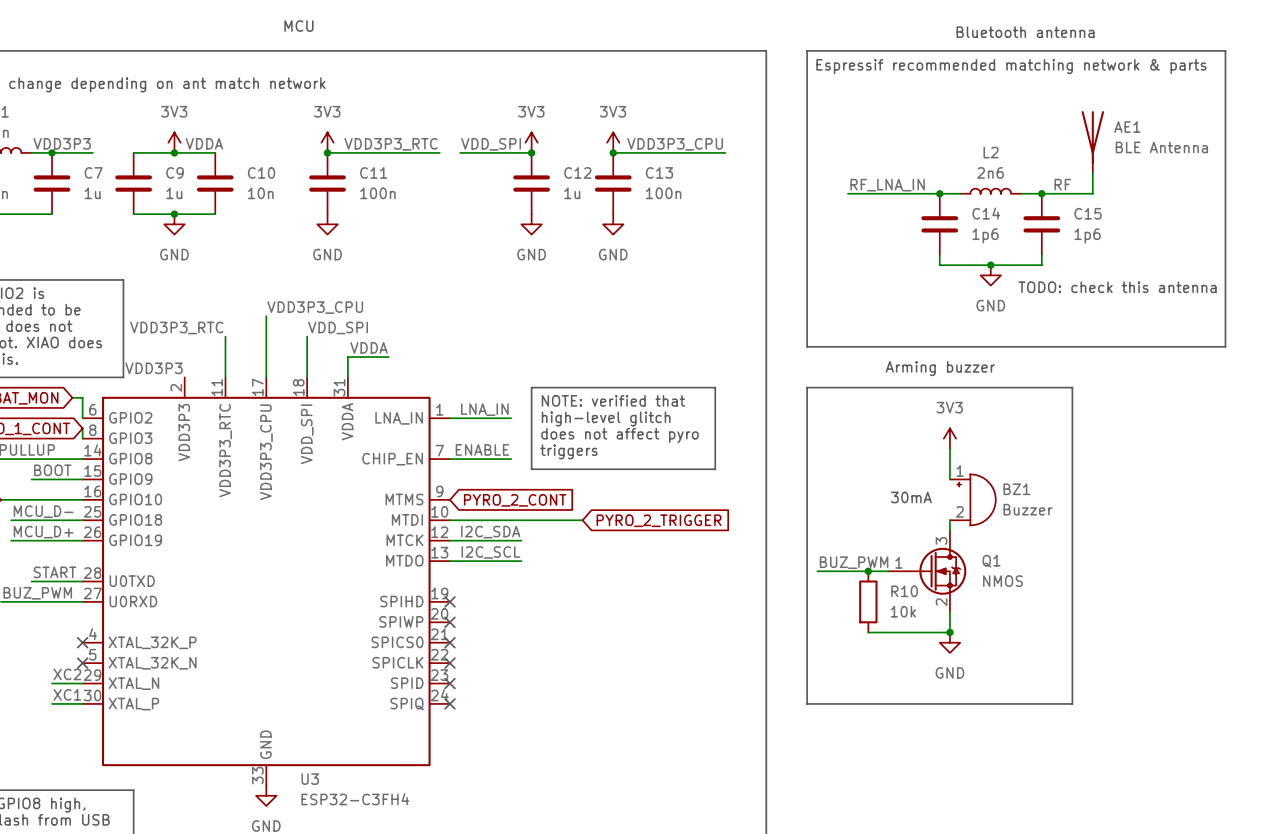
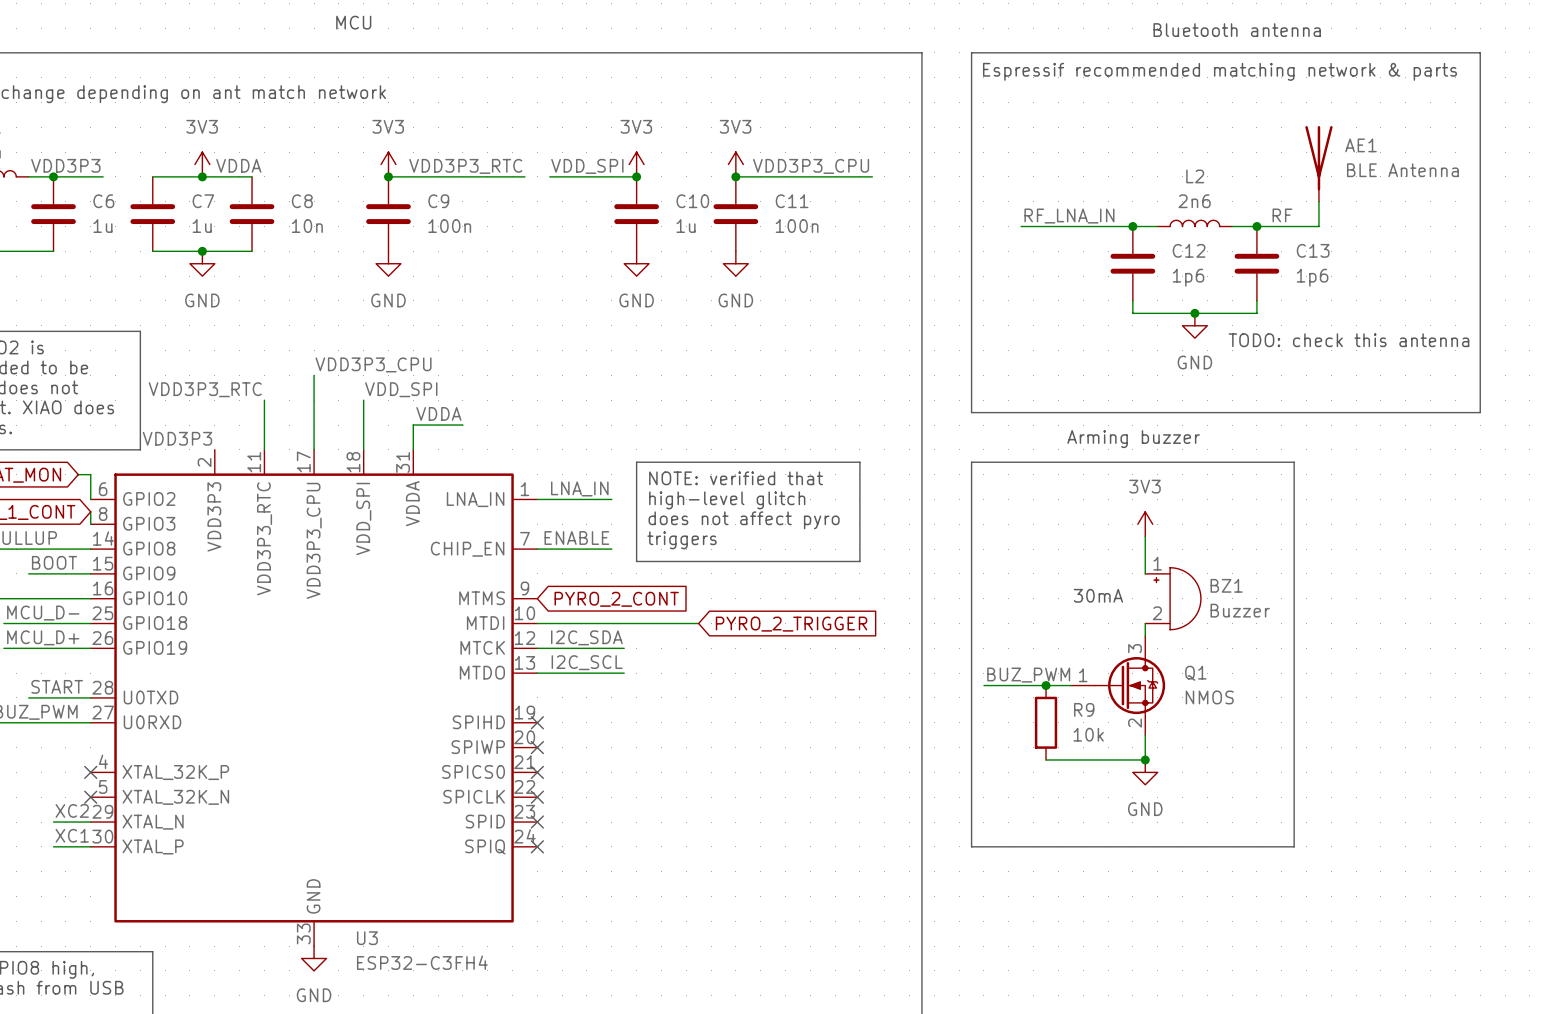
C7 name: C7 (93, 172) -> C6 (103, 201)
C9 name: C9 (175, 172) -> C7 (203, 201)
C10 name: C10 (261, 172) -> C8 (302, 201)
C11 name: C11 (373, 172) -> C9 (438, 201)
C12 name: C12 (577, 172) -> C10 (692, 201)
C13 name: C13 (659, 172) -> C11 (792, 201)
C14 name: C14 (986, 213) -> C12 (1189, 250)
C15 name: C15 (1088, 213) -> C13 (1313, 250)
R10 name: R10 (904, 591) -> R9 (1084, 709)

